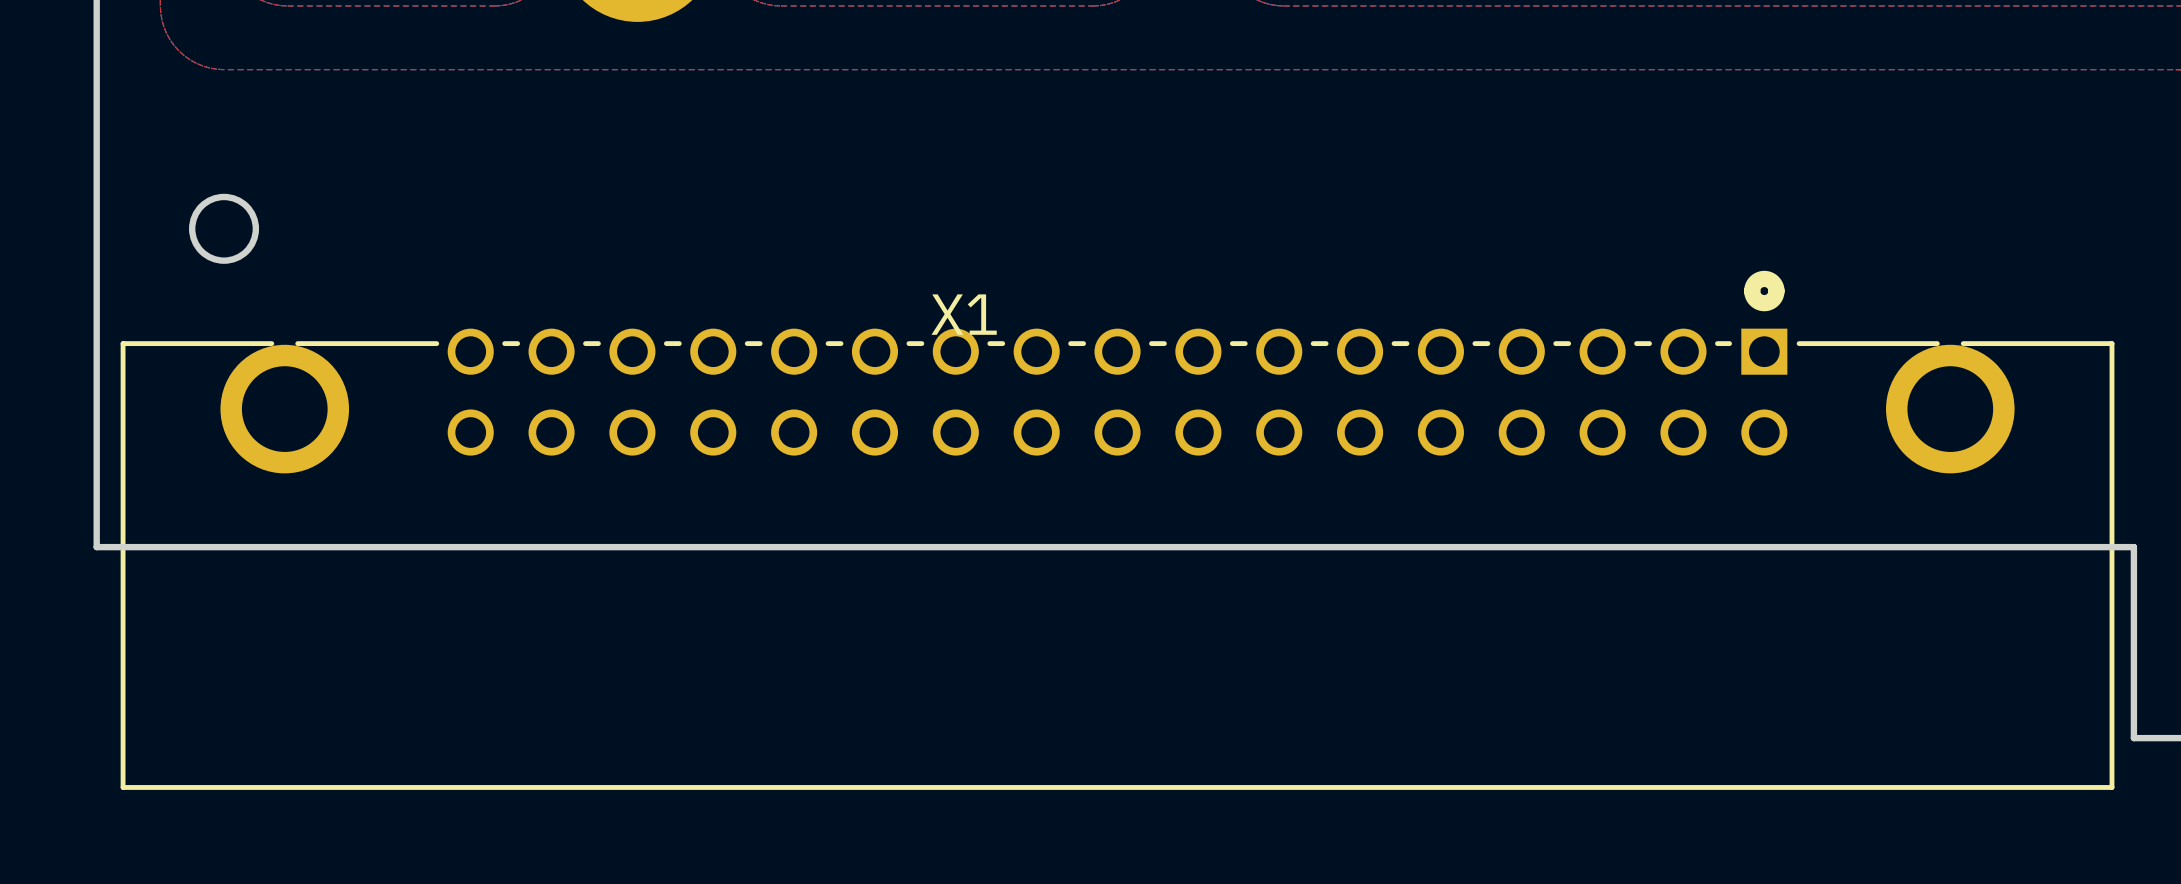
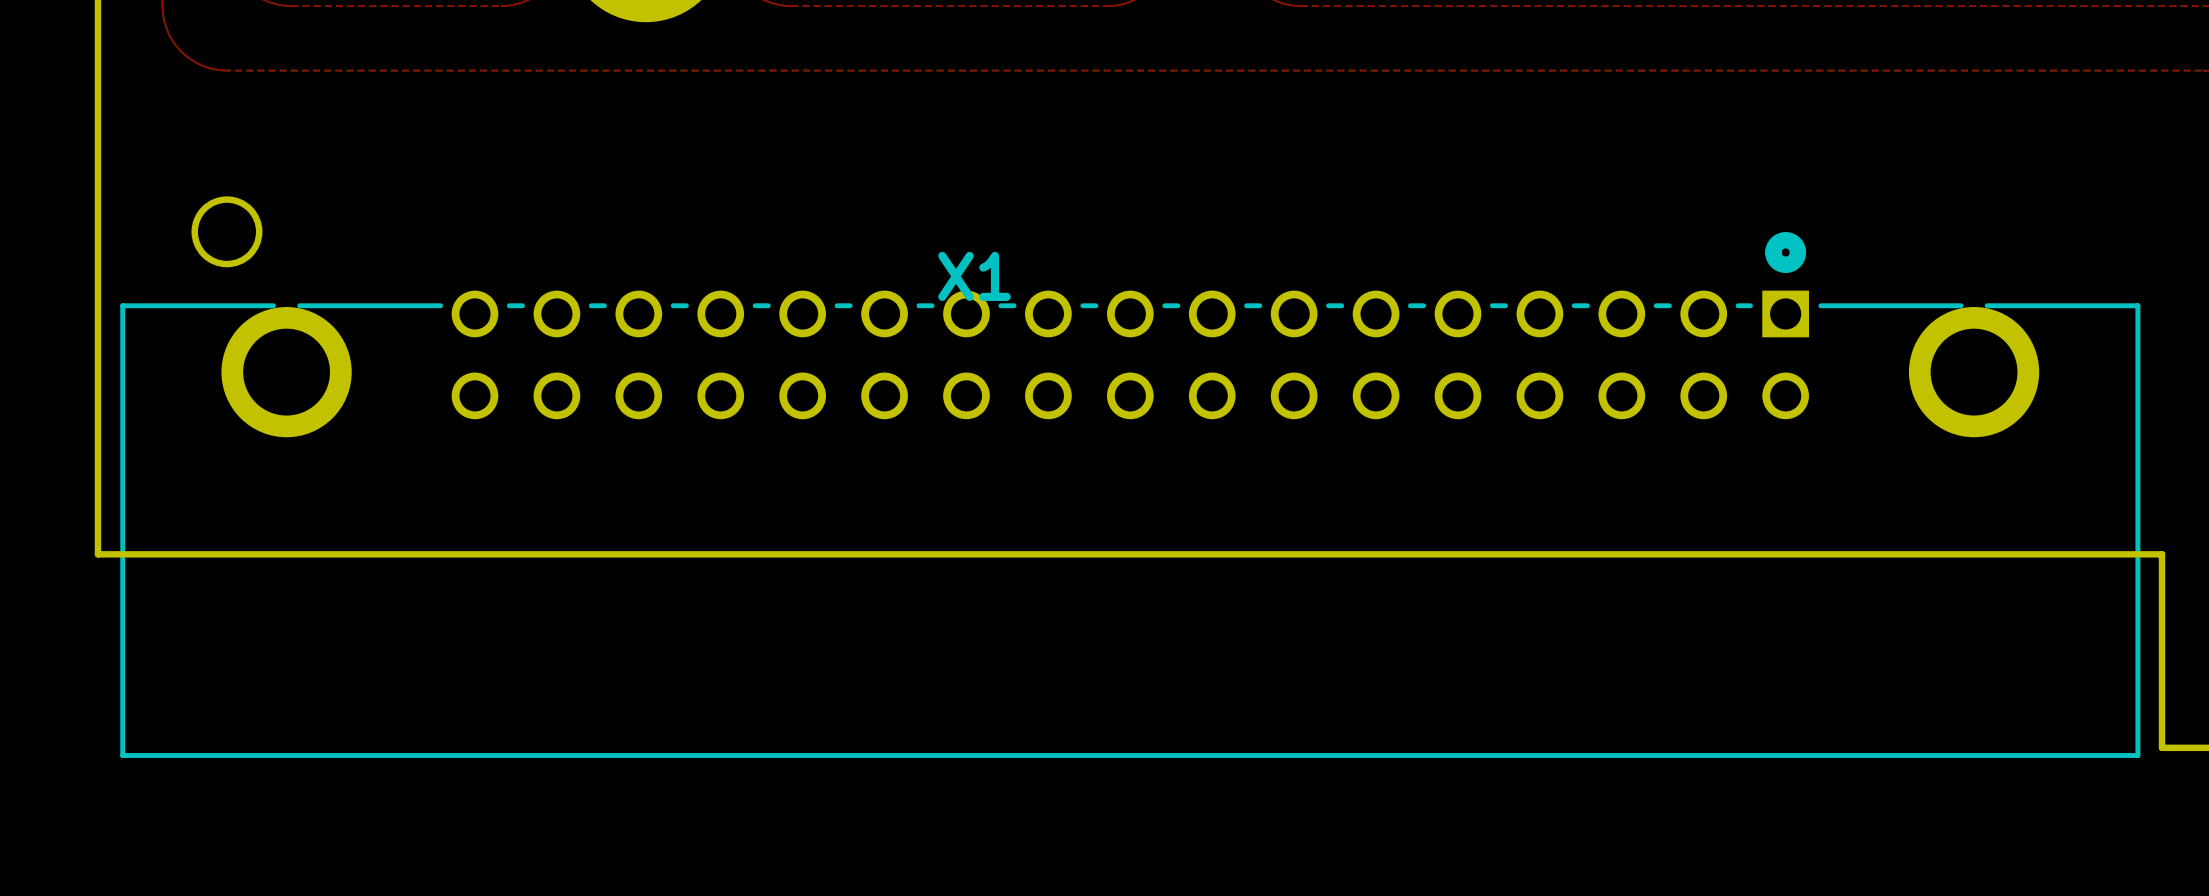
X1 position: (1117, 530) -> (1130, 494)

